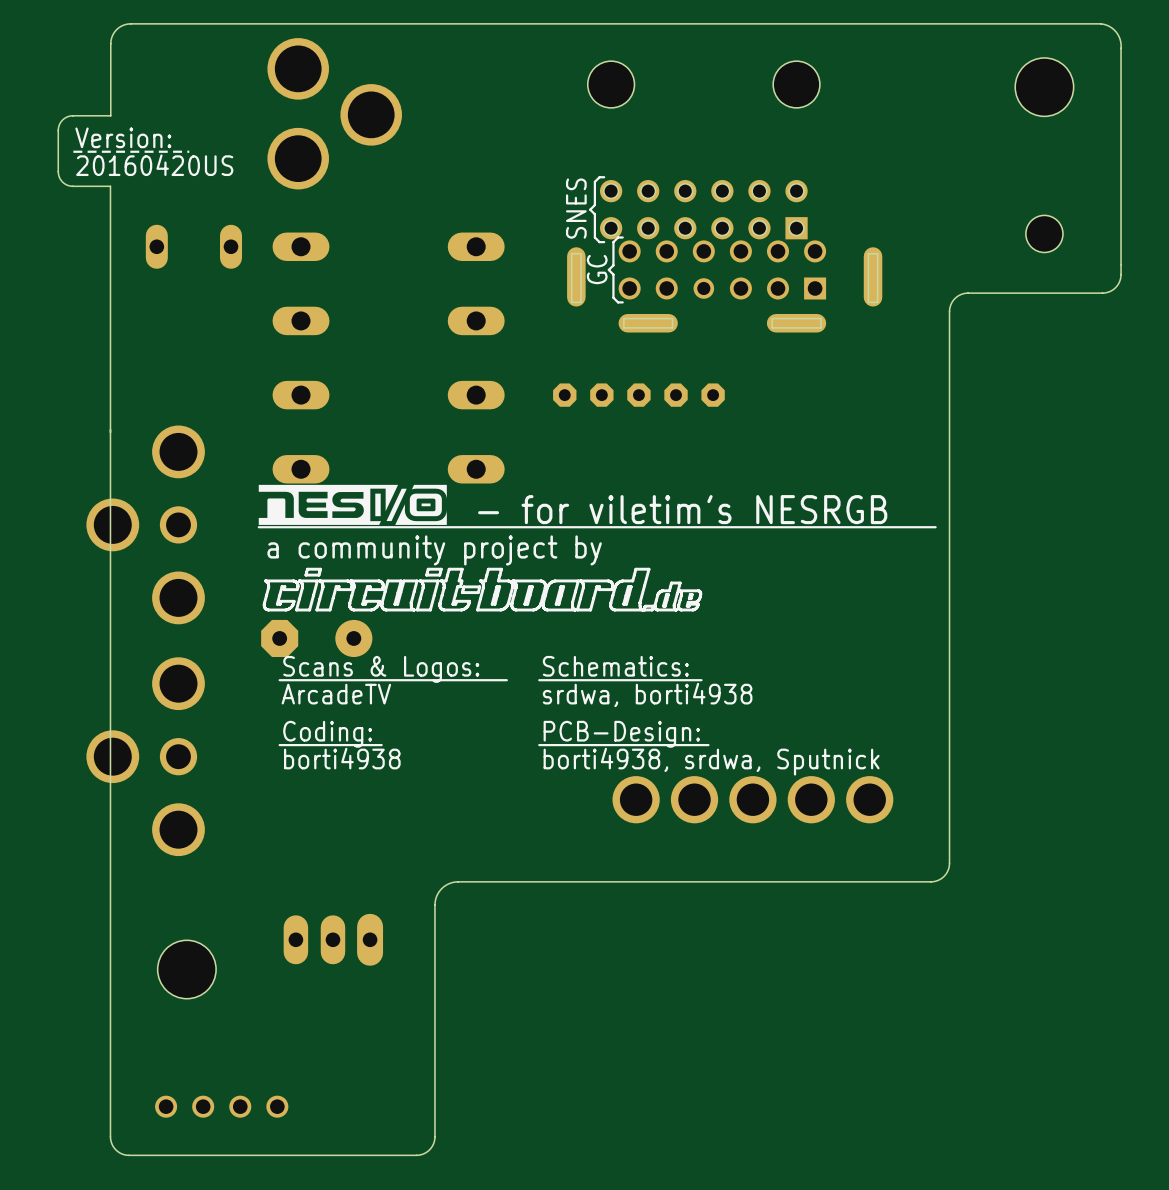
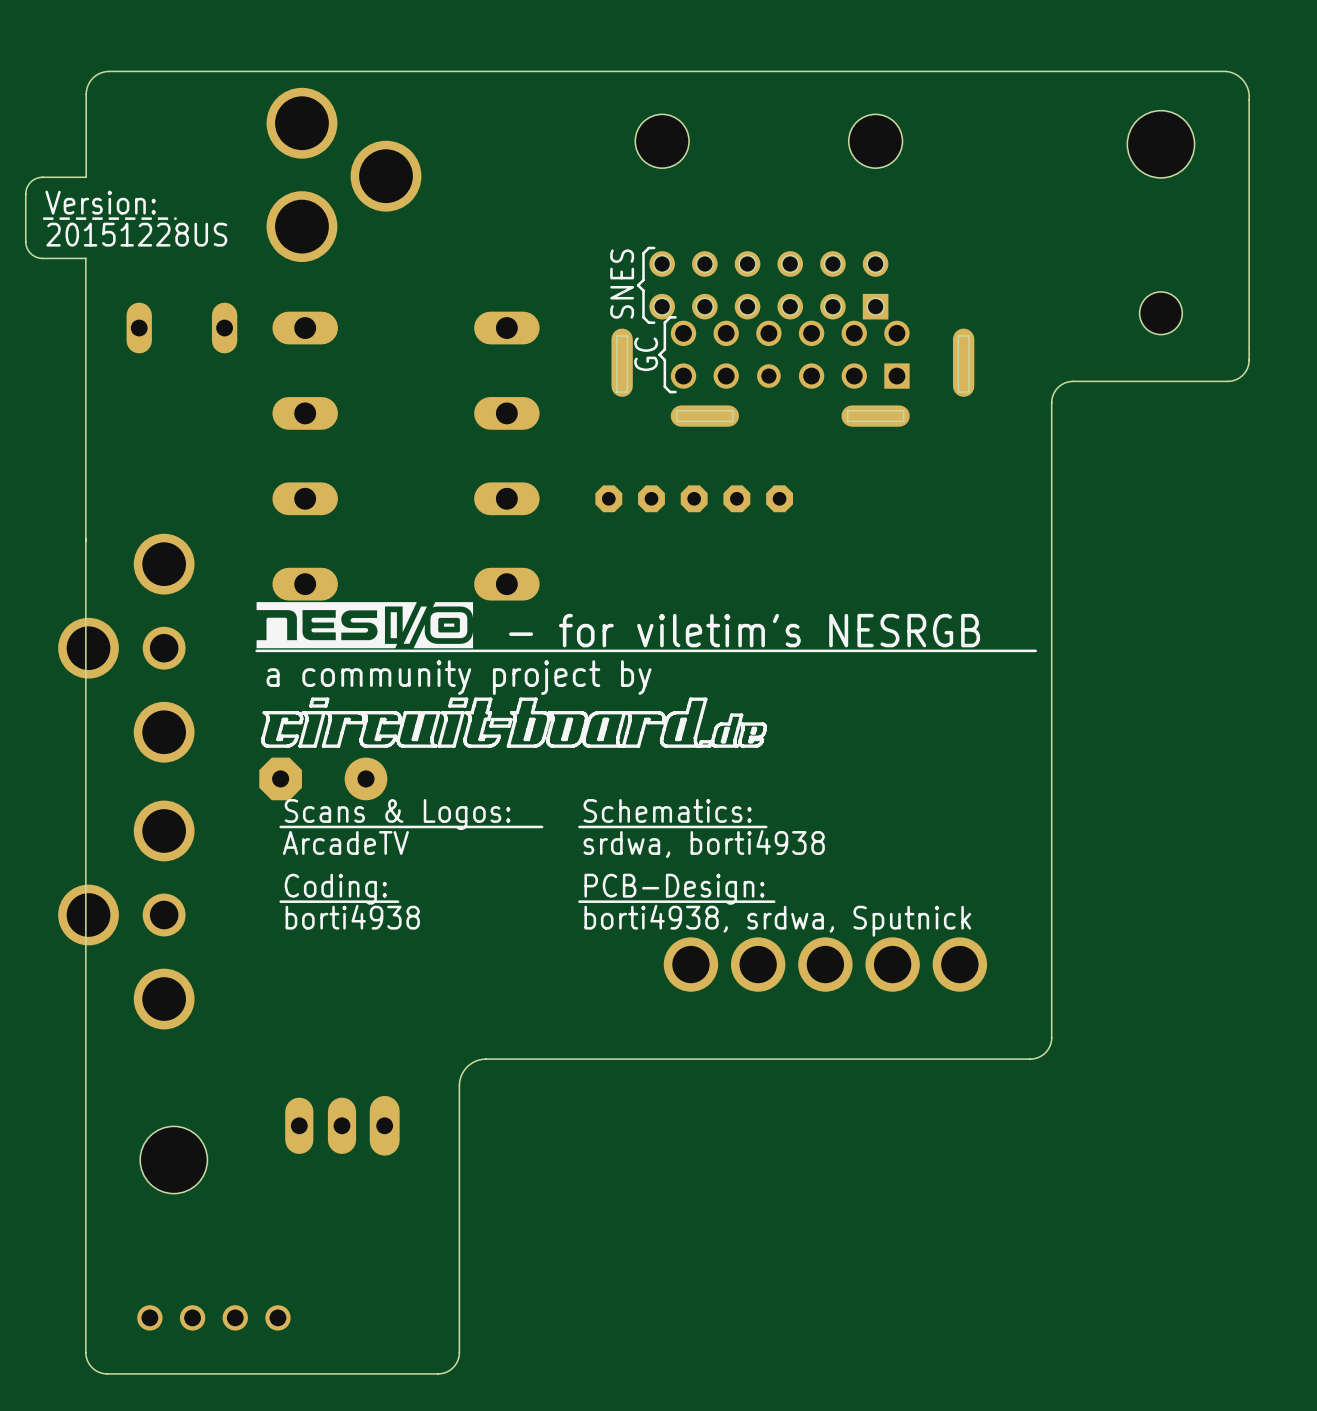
text: 20160420US (154, 165) -> 20151228US (136, 234)

